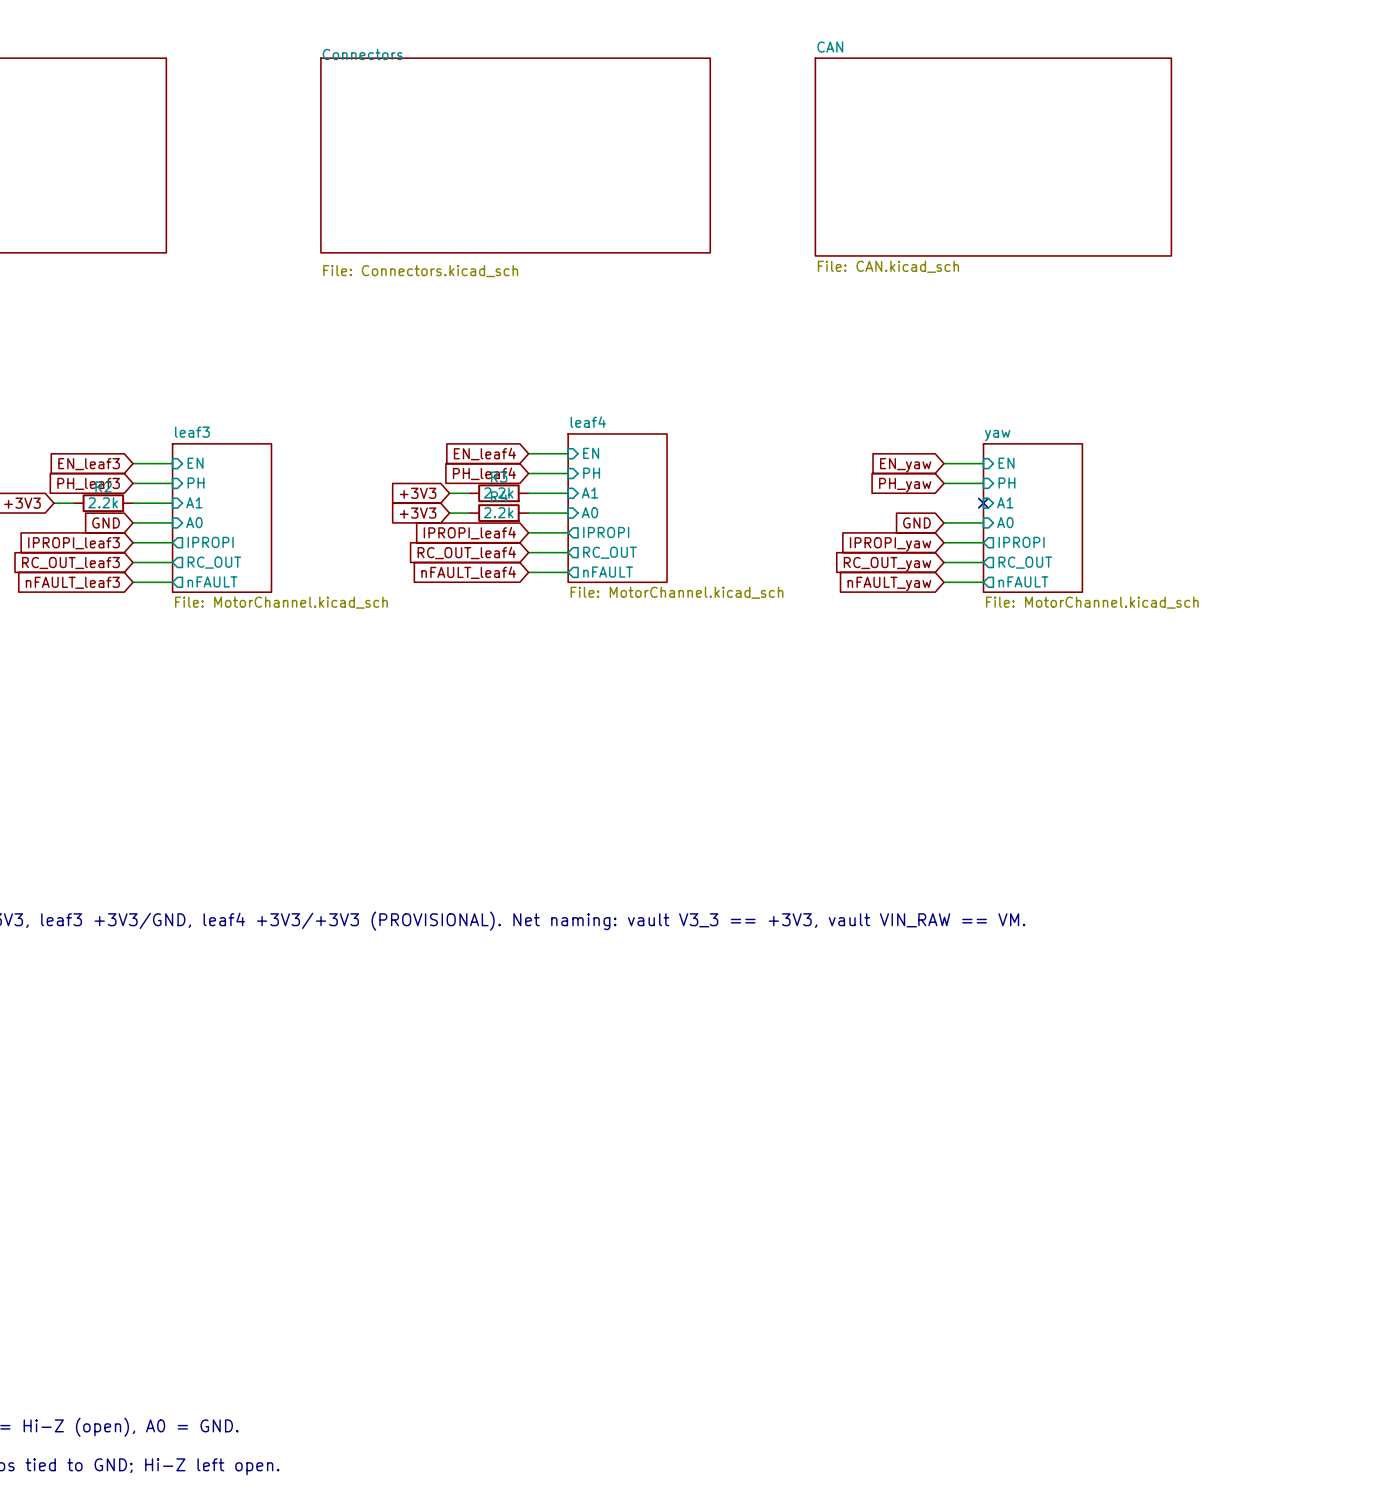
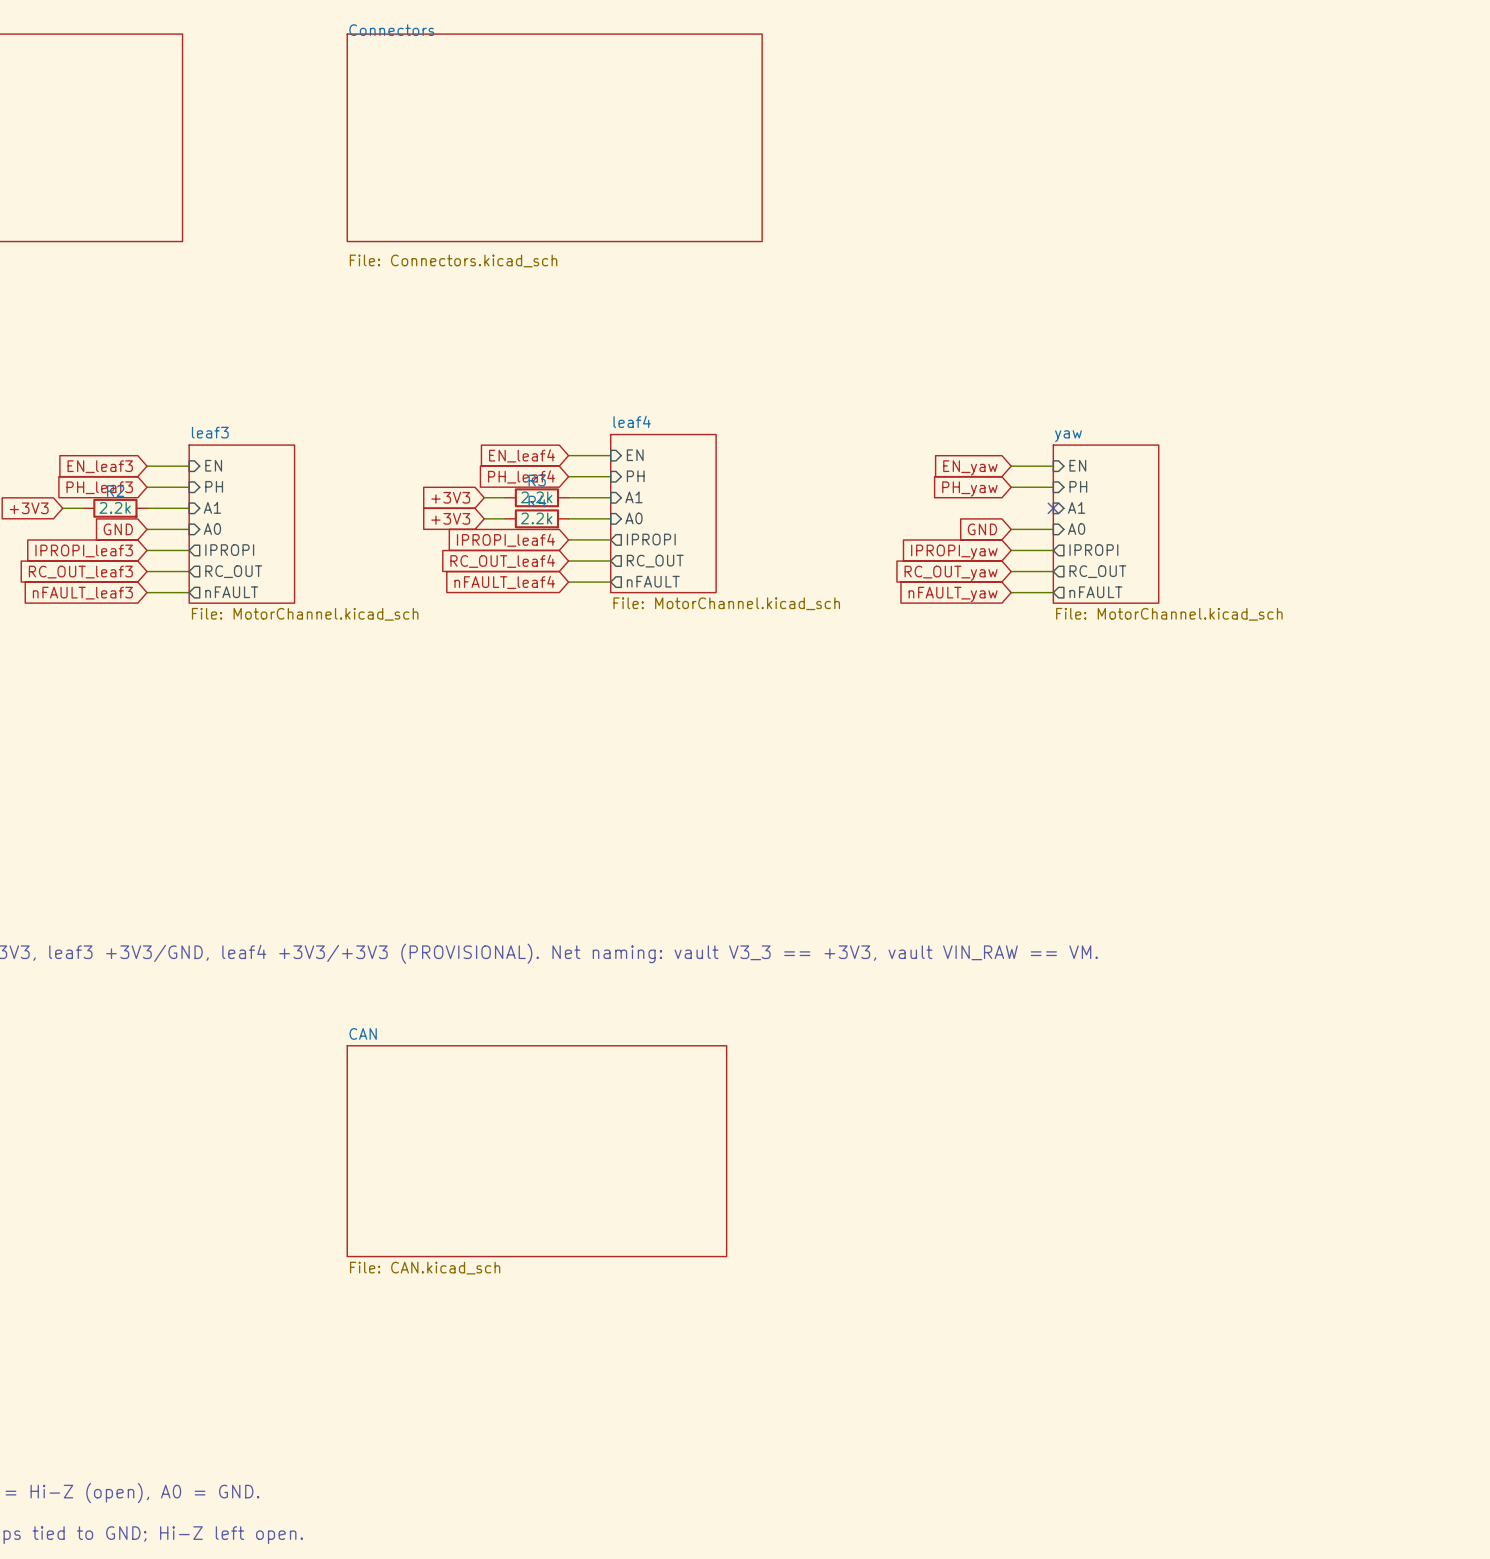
sheet CAN: File: CAN.kicad_sch (993, 157) -> none
sheet CAN: none -> File: CAN.kicad_sch (536, 1151)

